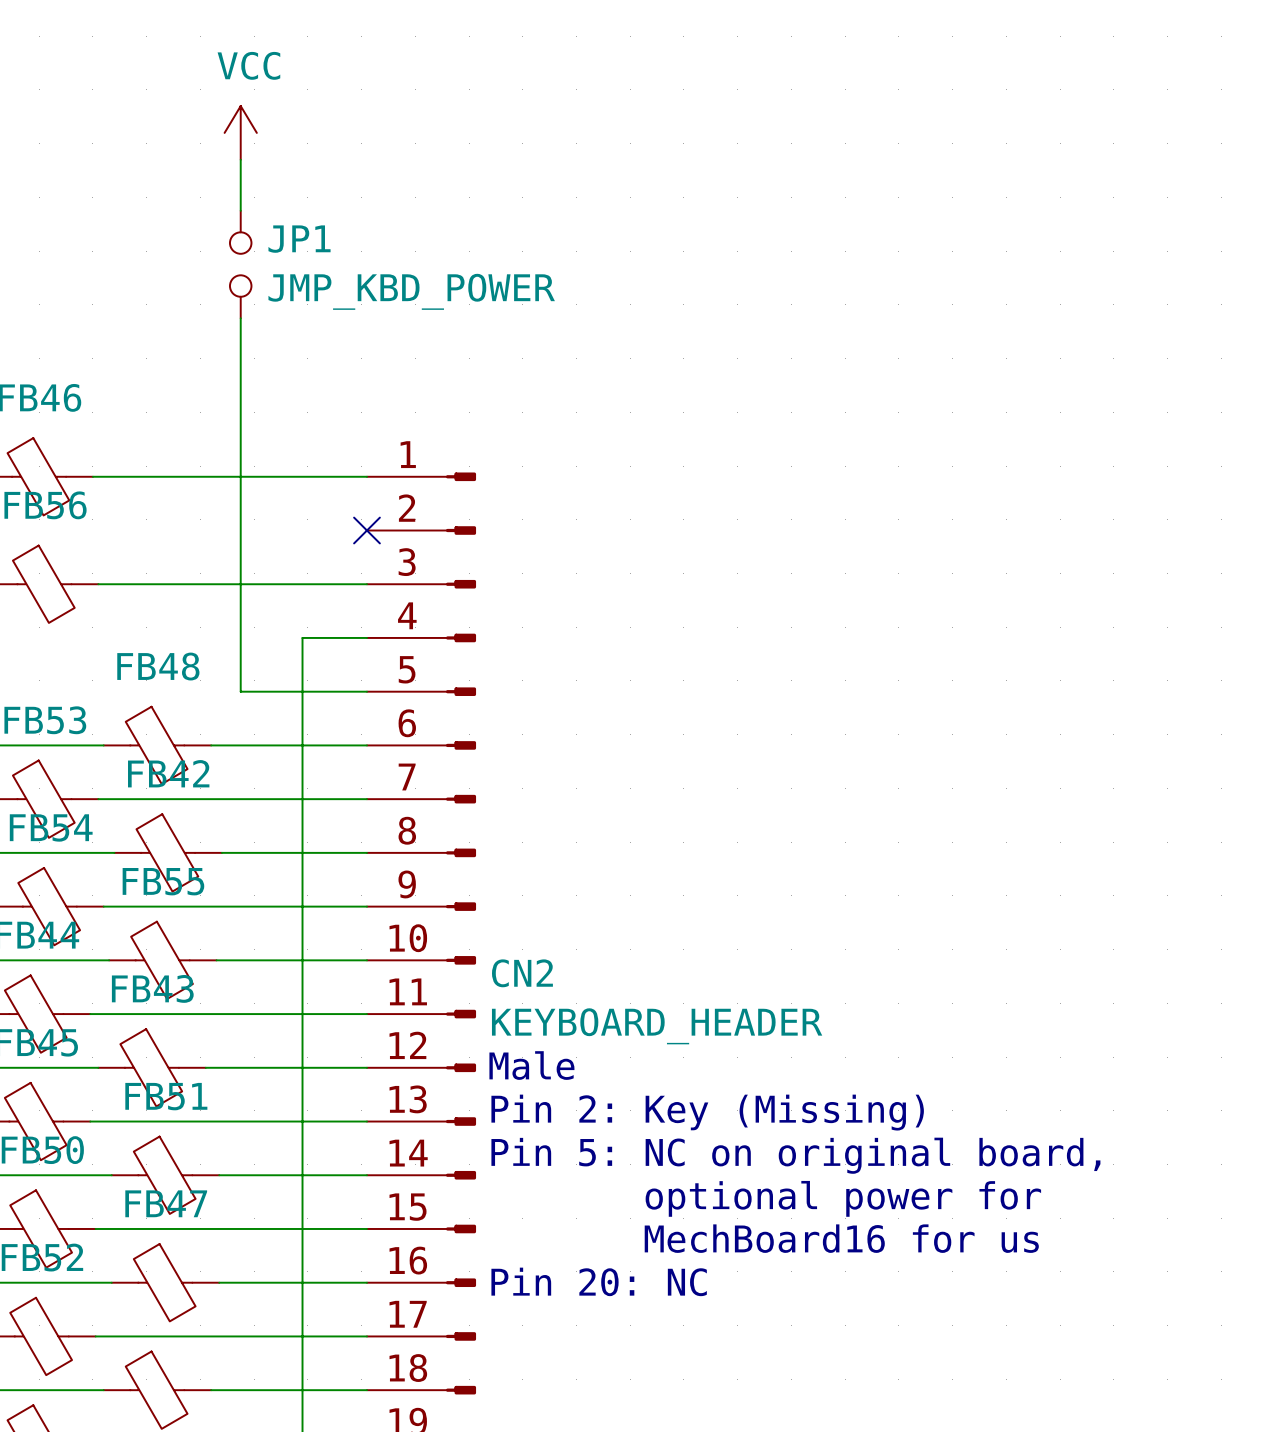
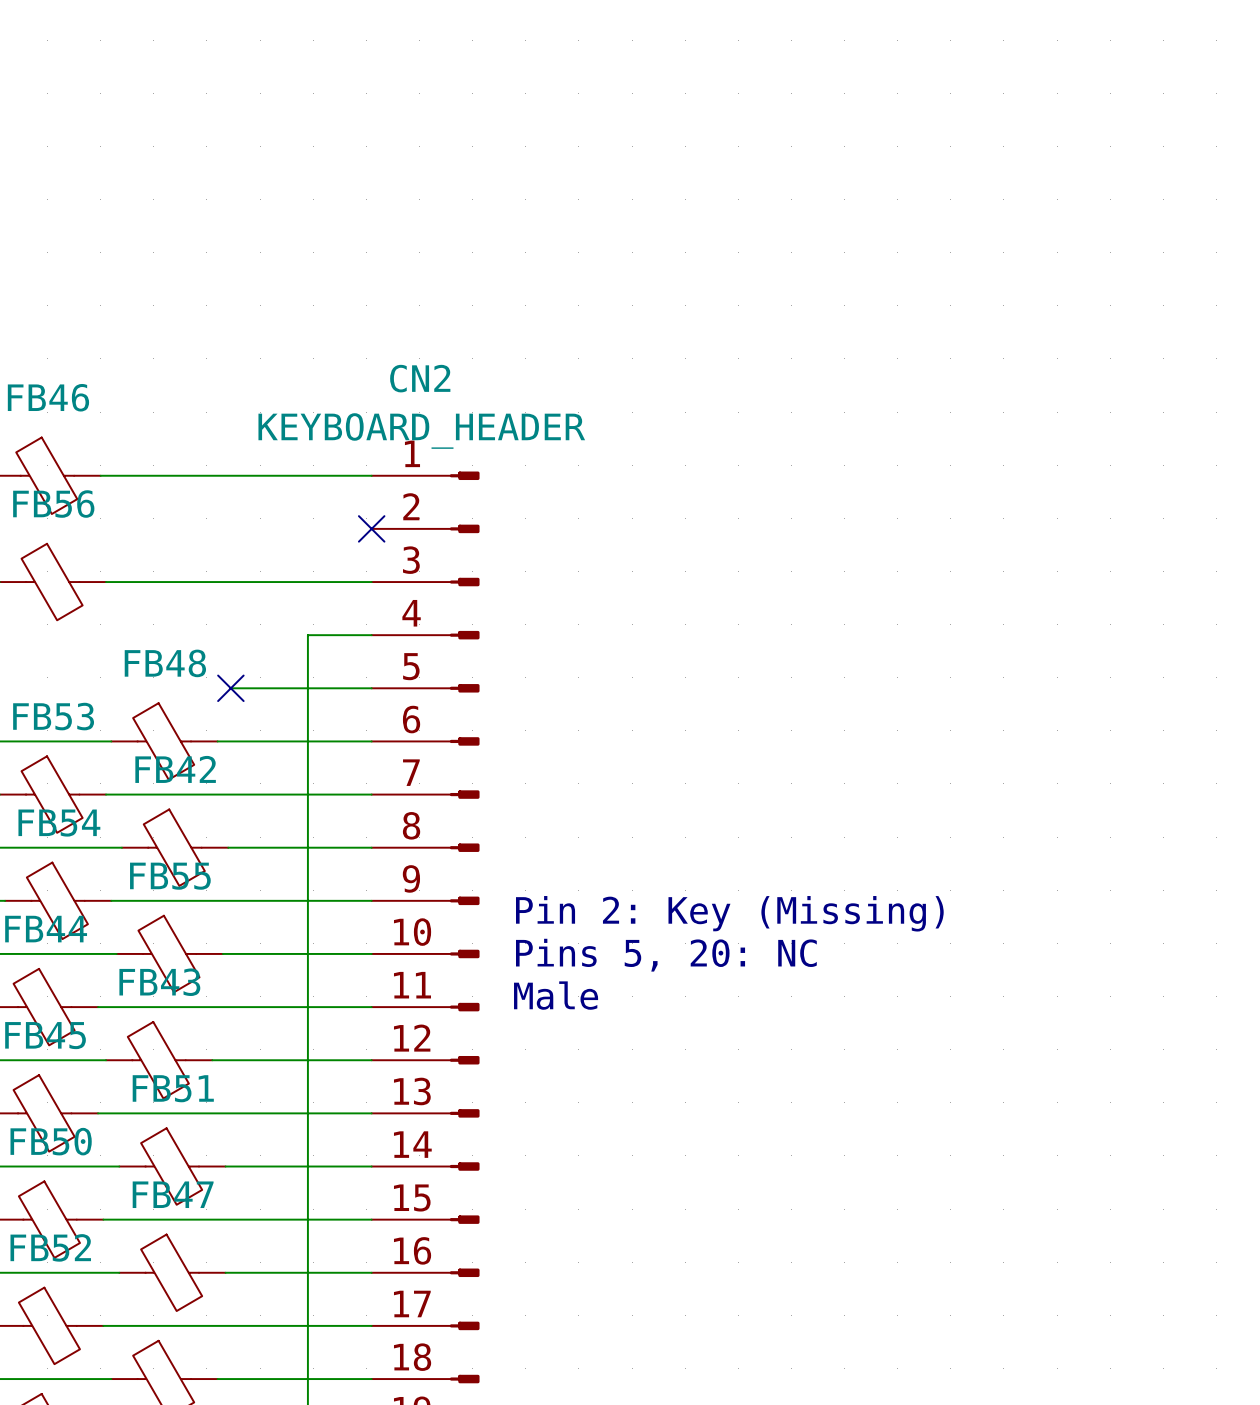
power symbol: VCC (240, 132) -> none
wire: (240, 159) (240, 210) -> none
JP1: JMP_KBD_POWER (240, 264) -> none
wire: (240, 318) (240, 691) -> (230, 688) (246, 688)
no-connect mark: none -> (230, 688)
text: none -> Pins 5, 20: NC (666, 955)
CN2 name position: CN2 (522, 973) -> CN2 (420, 378)
CN2 value position: KEYBOARD_HEADER (657, 1026) -> KEYBOARD_HEADER (421, 431)
text position: Male (531, 1065) -> Male (556, 995)
text position: Pin 2: Key (Missing) (707, 1112) -> Pin 2: Key (Missing) (729, 913)
text: Pin 5: NC on original board, (795, 1155) -> none
text: optional power for (843, 1198) -> none
text: MechBoard16 for us (841, 1238) -> none
text: Pin 20: NC (599, 1281) -> none

